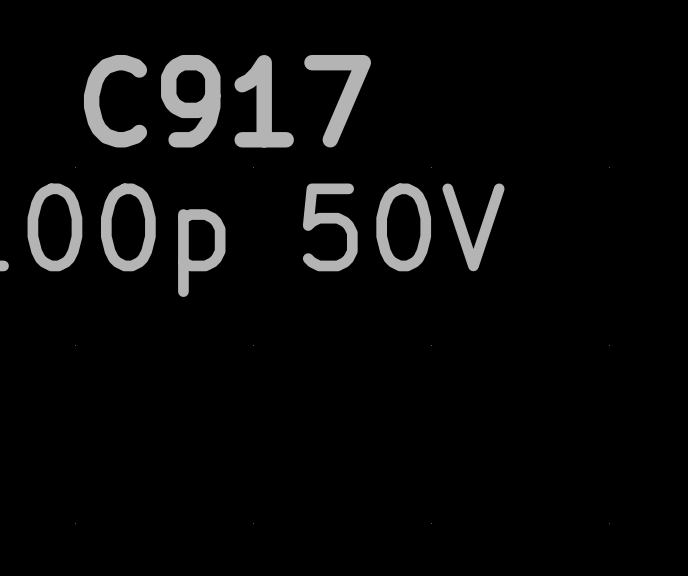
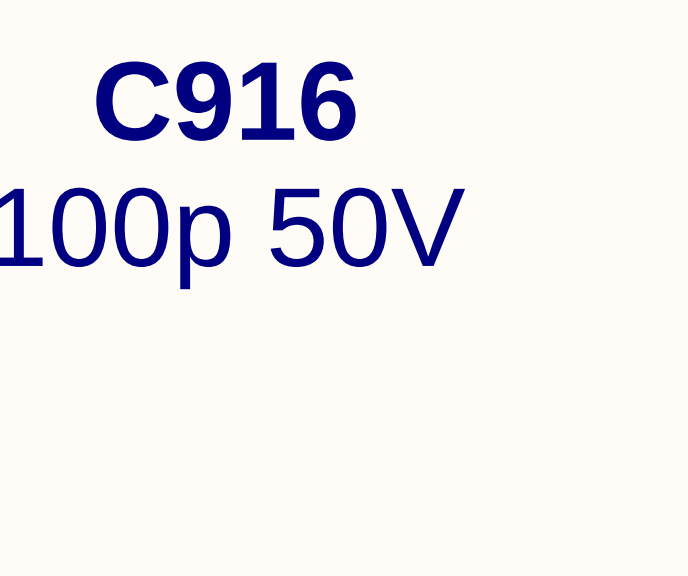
C917 name: C917 (227, 101) -> C916 (225, 101)

